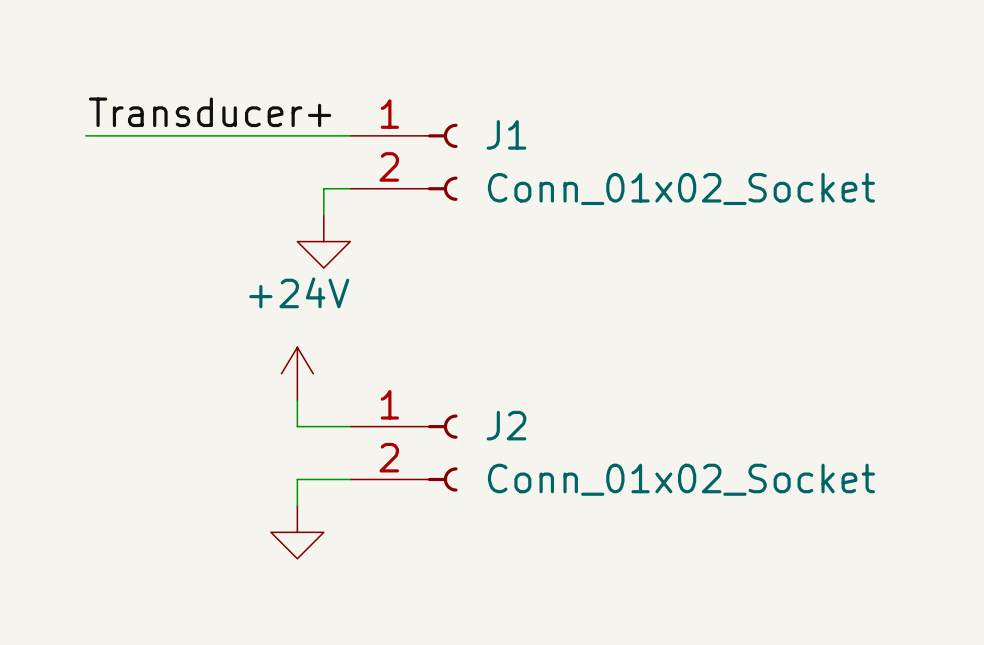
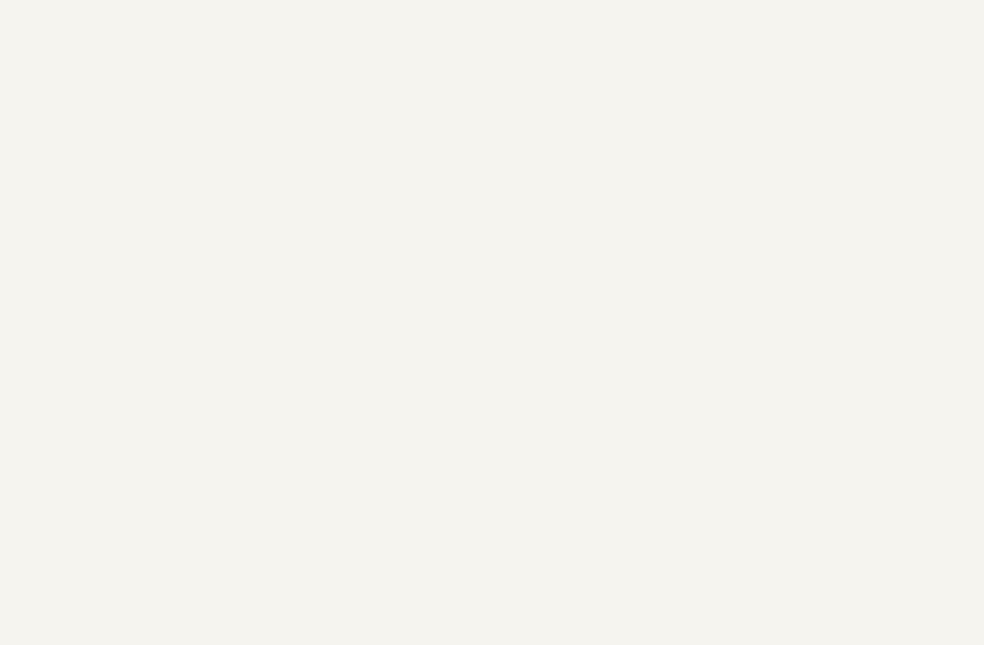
label: Transducer+ (210, 112) -> none
wire: (85, 135) (350, 135) -> none
J1: Conn_01x02_Socket (403, 162) -> none
wire: (350, 188) (323, 188) (323, 215) -> none
power symbol: (323, 241) -> none
power symbol: +24V (297, 373) -> none
wire: (297, 400) (297, 426) (350, 426) -> none
J2: Conn_01x02_Socket (403, 453) -> none
wire: (350, 479) (297, 479) (297, 505) -> none
power symbol: (297, 532) -> none

